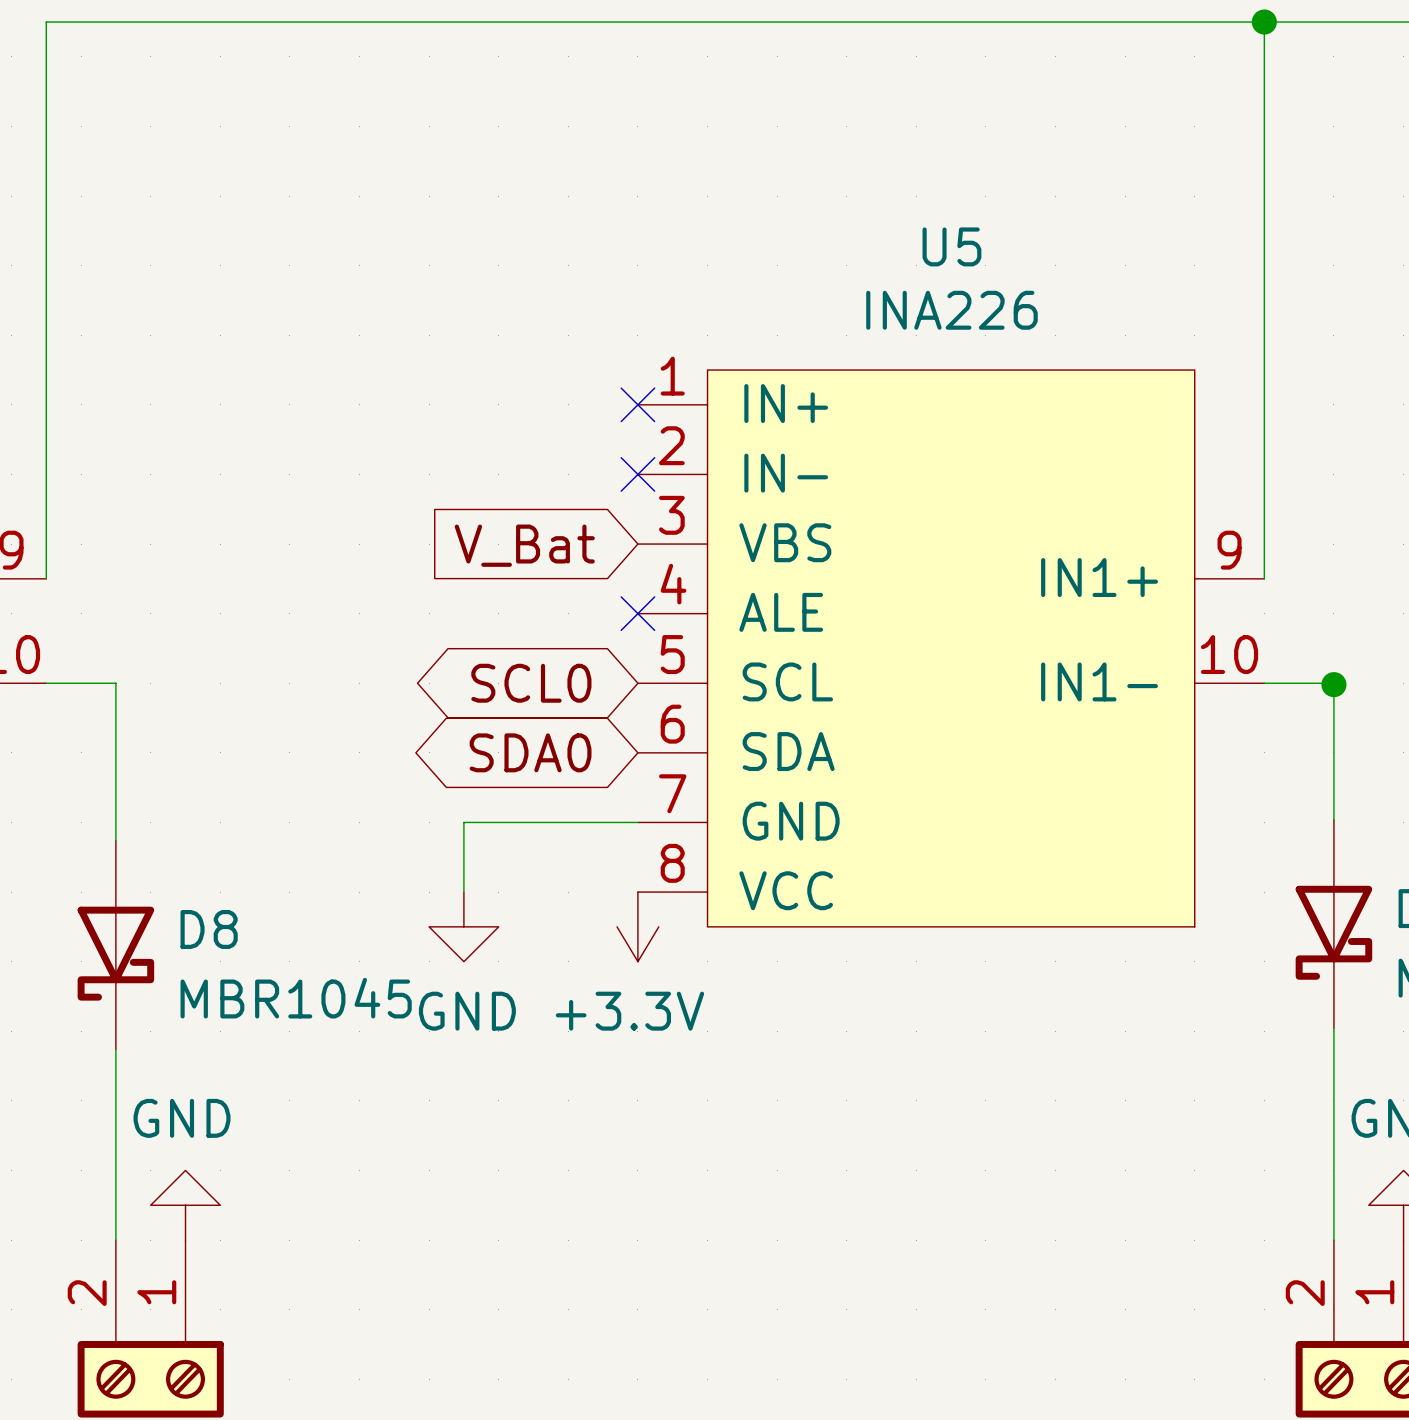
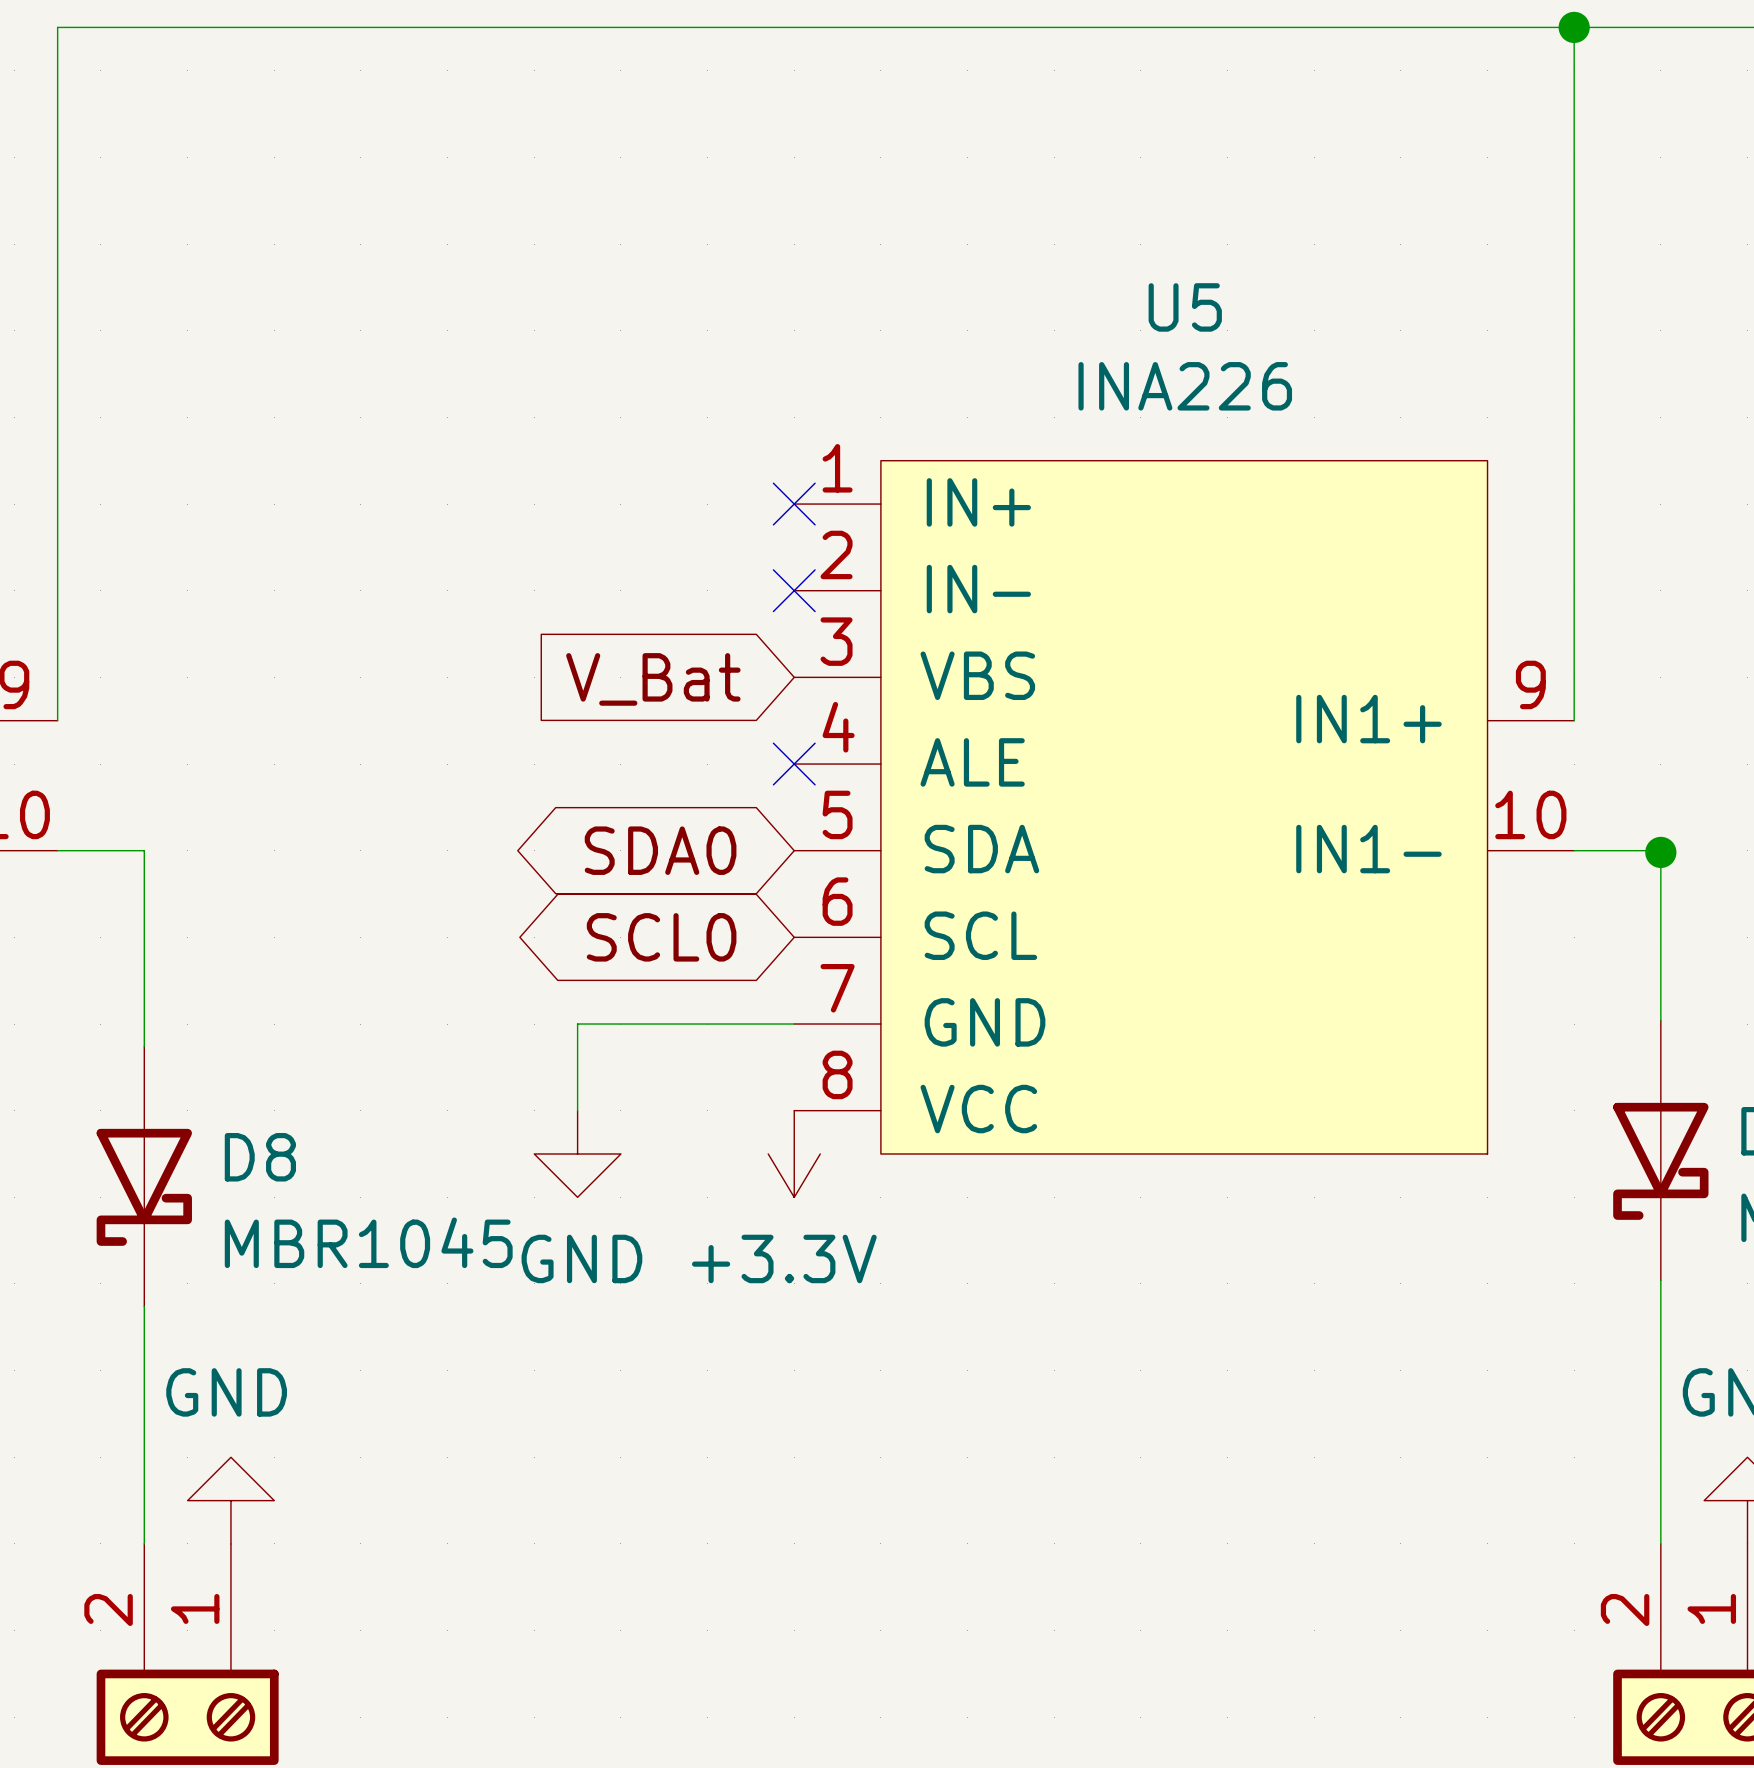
U5 pin name: SCL (787, 681) -> SDA (981, 849)
global label: SCL0 (531, 683) -> SDA0 (660, 850)
U5 pin name: SDA (788, 751) -> SCL (980, 935)
global label: SDA0 (530, 752) -> SCL0 (661, 937)

